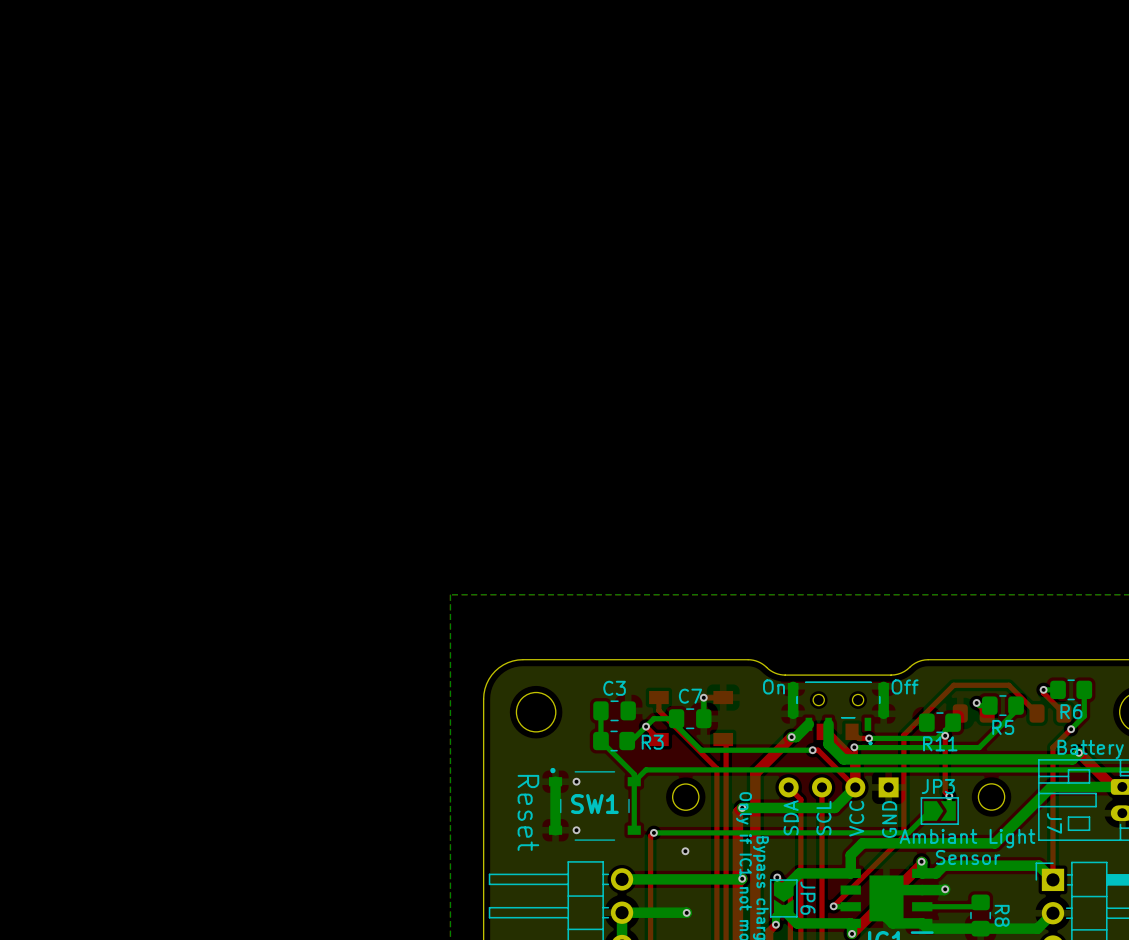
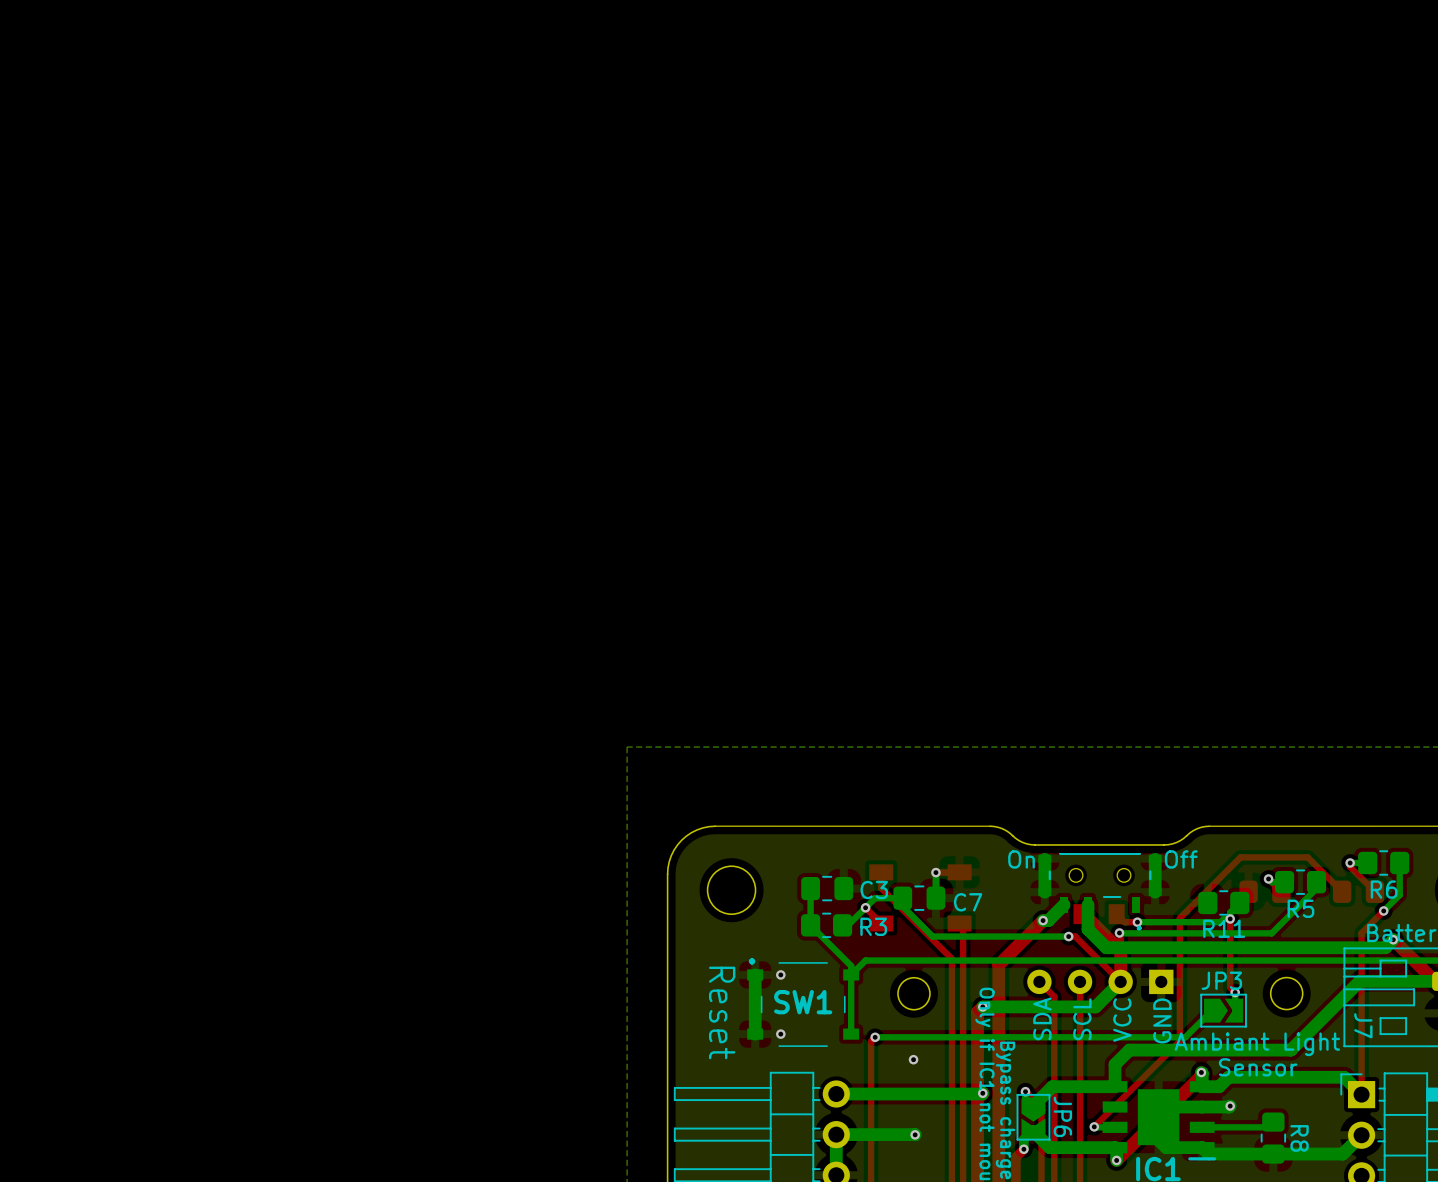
C3 name position: C3 (614, 688) -> C3 (874, 890)
C7 name position: C7 (690, 696) -> C7 (968, 902)

